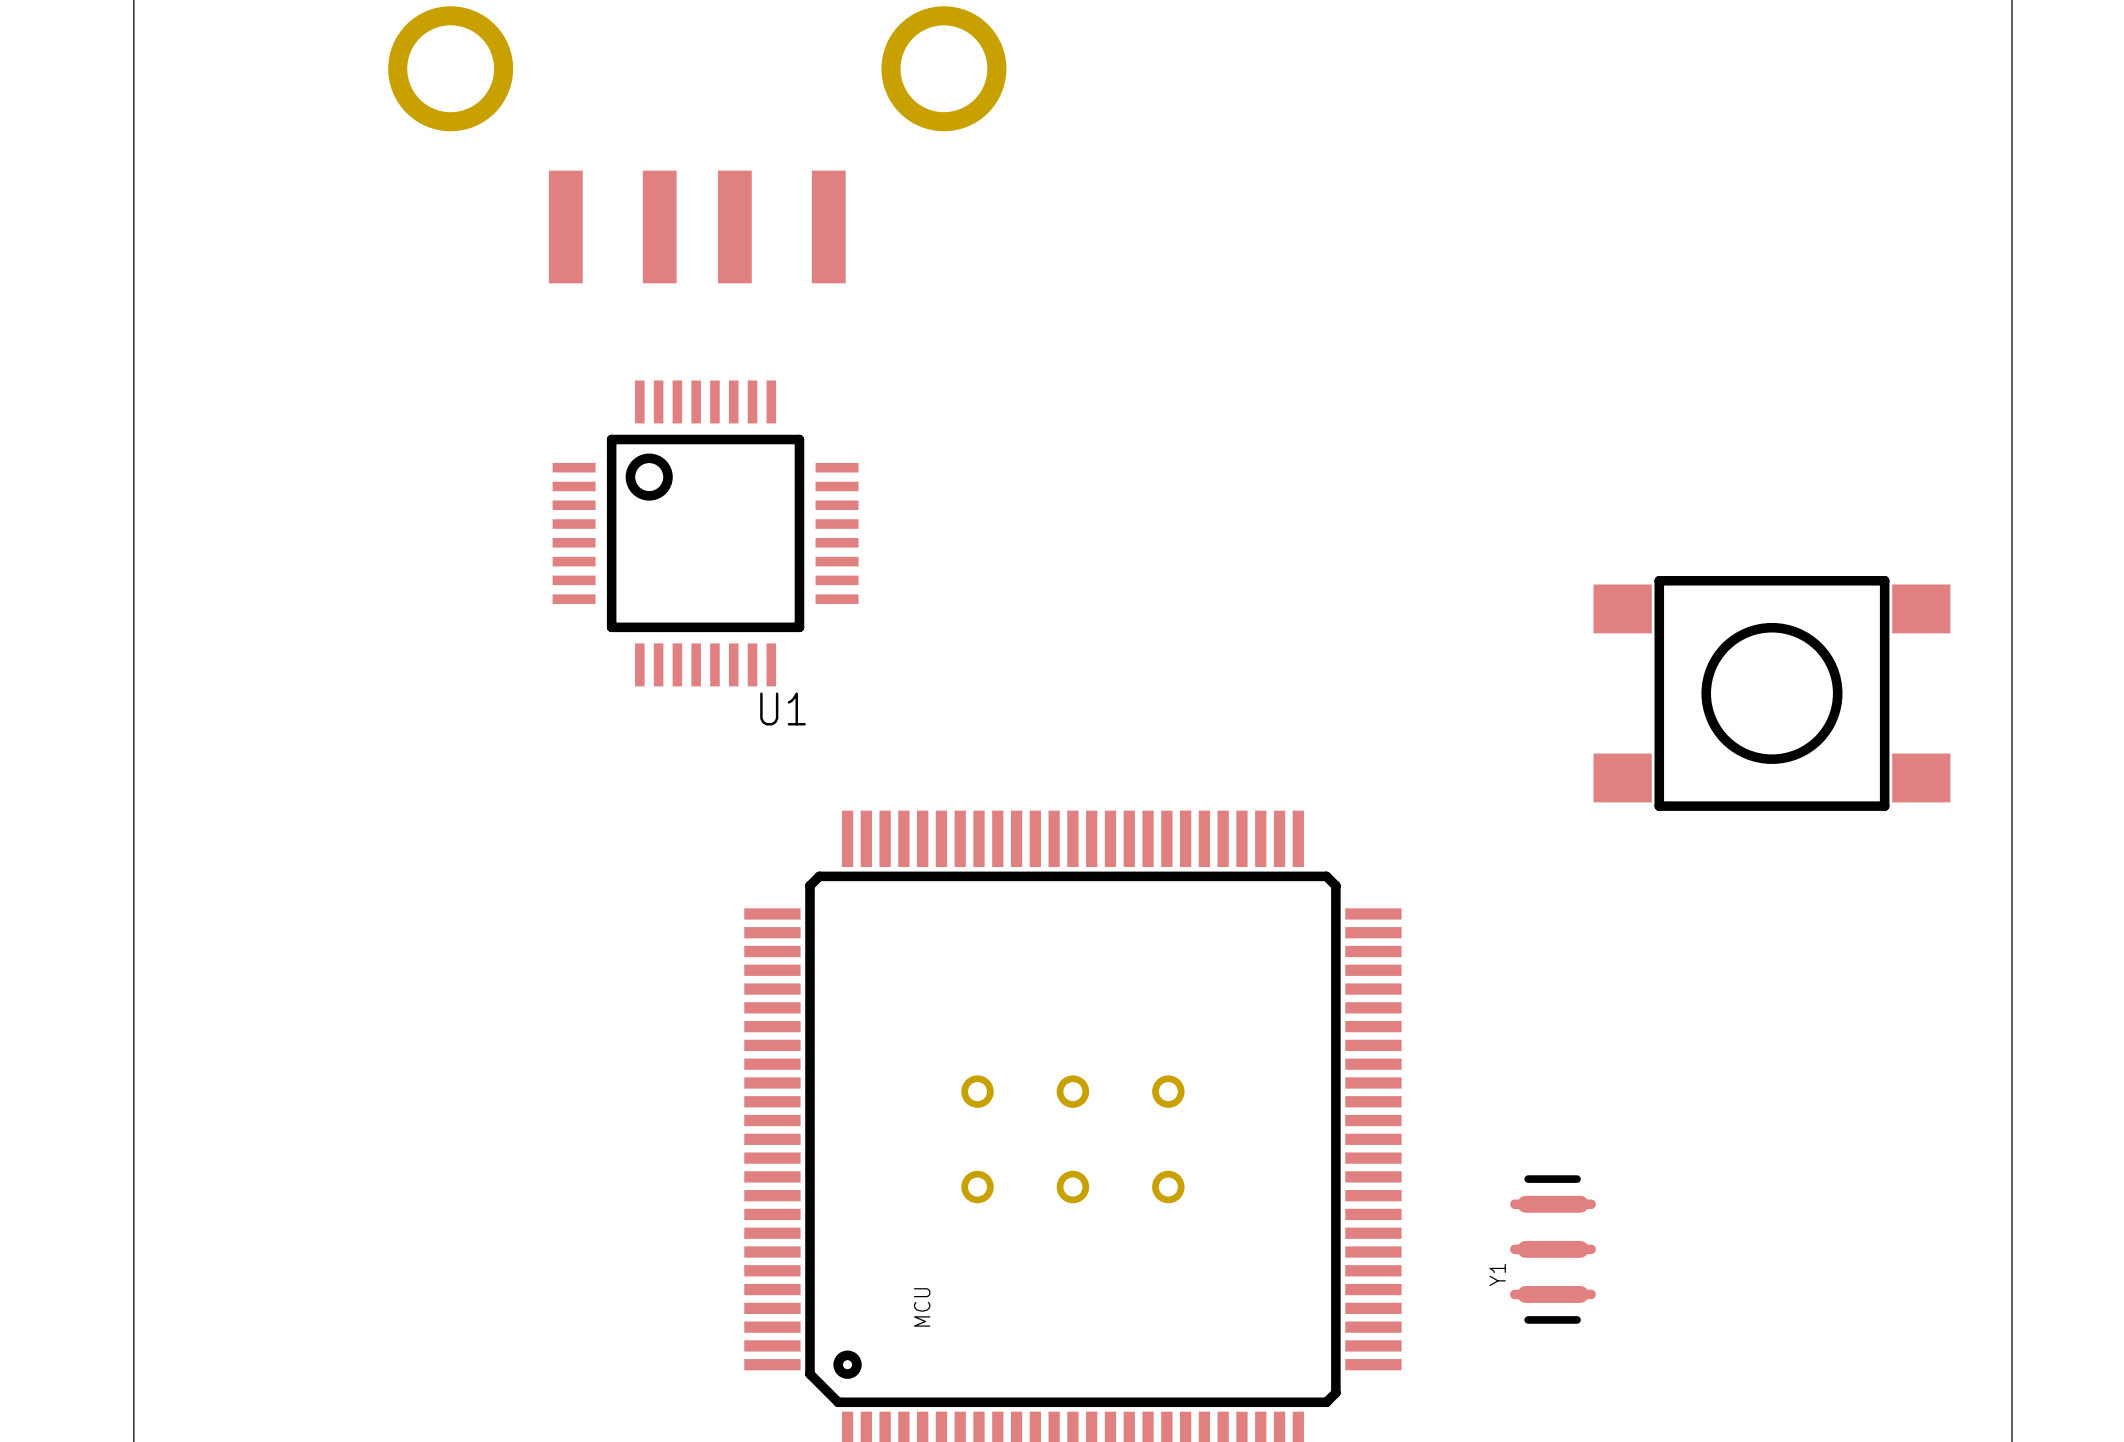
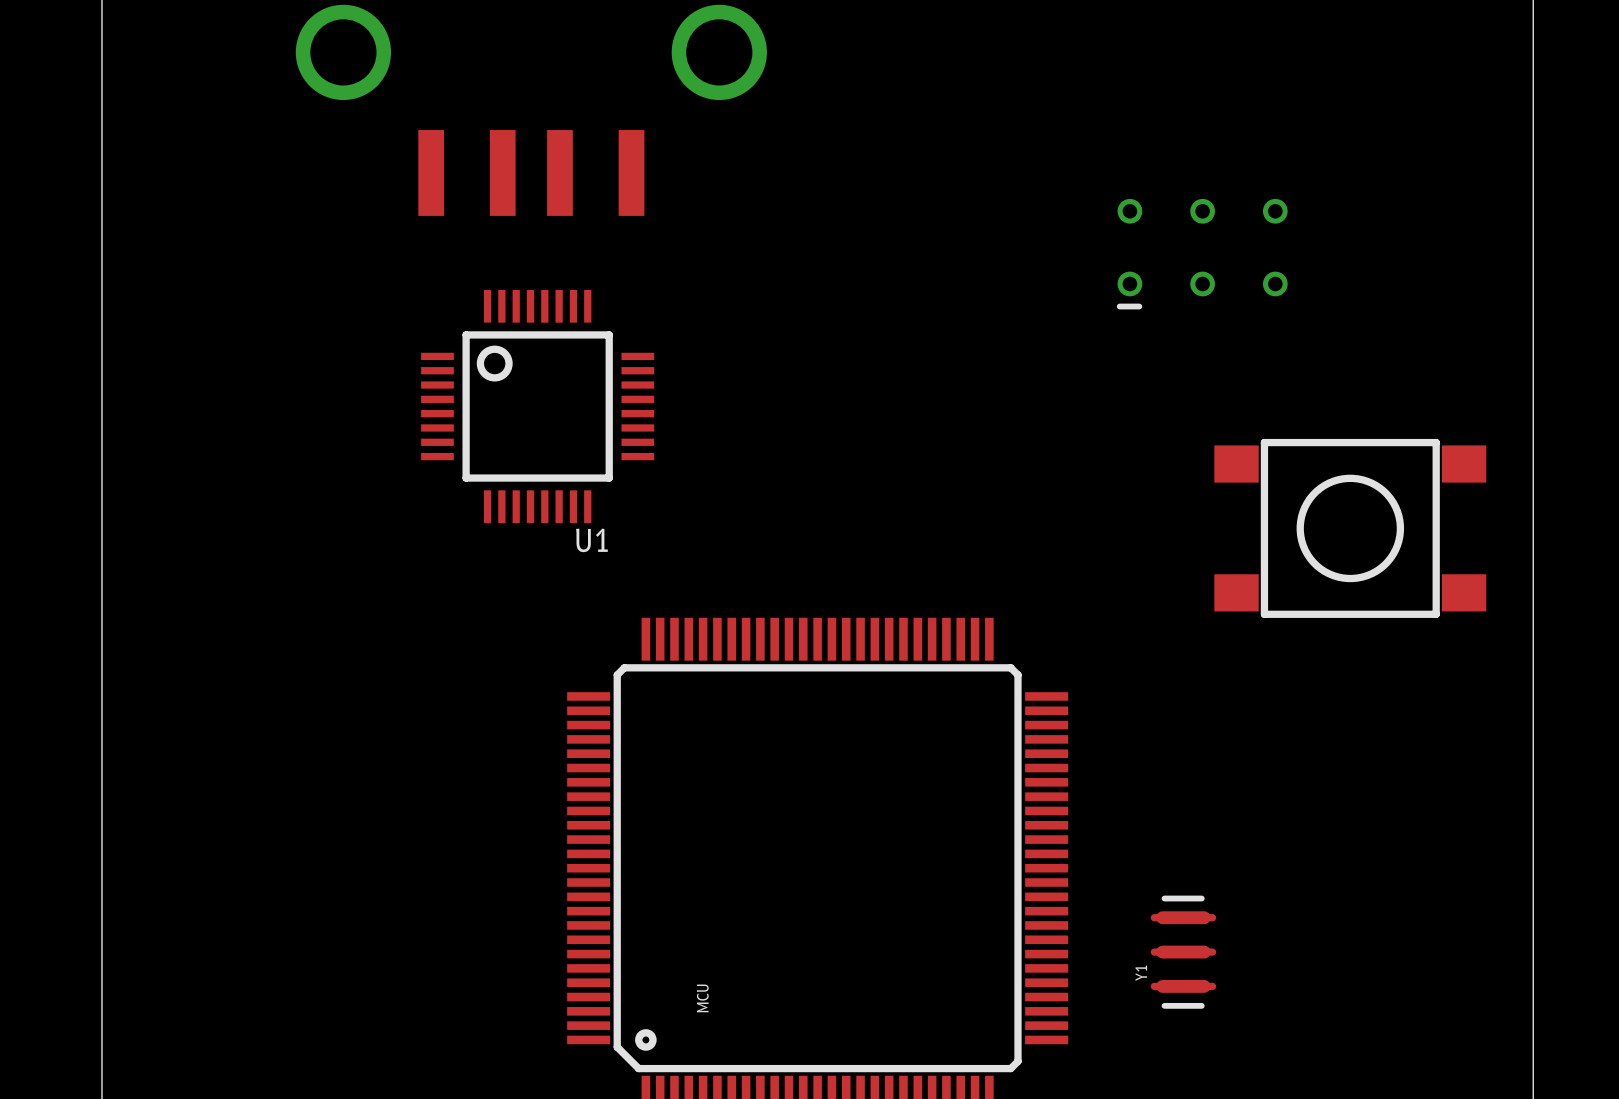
part: none -> (1202, 254)
part: (1072, 1139) -> none

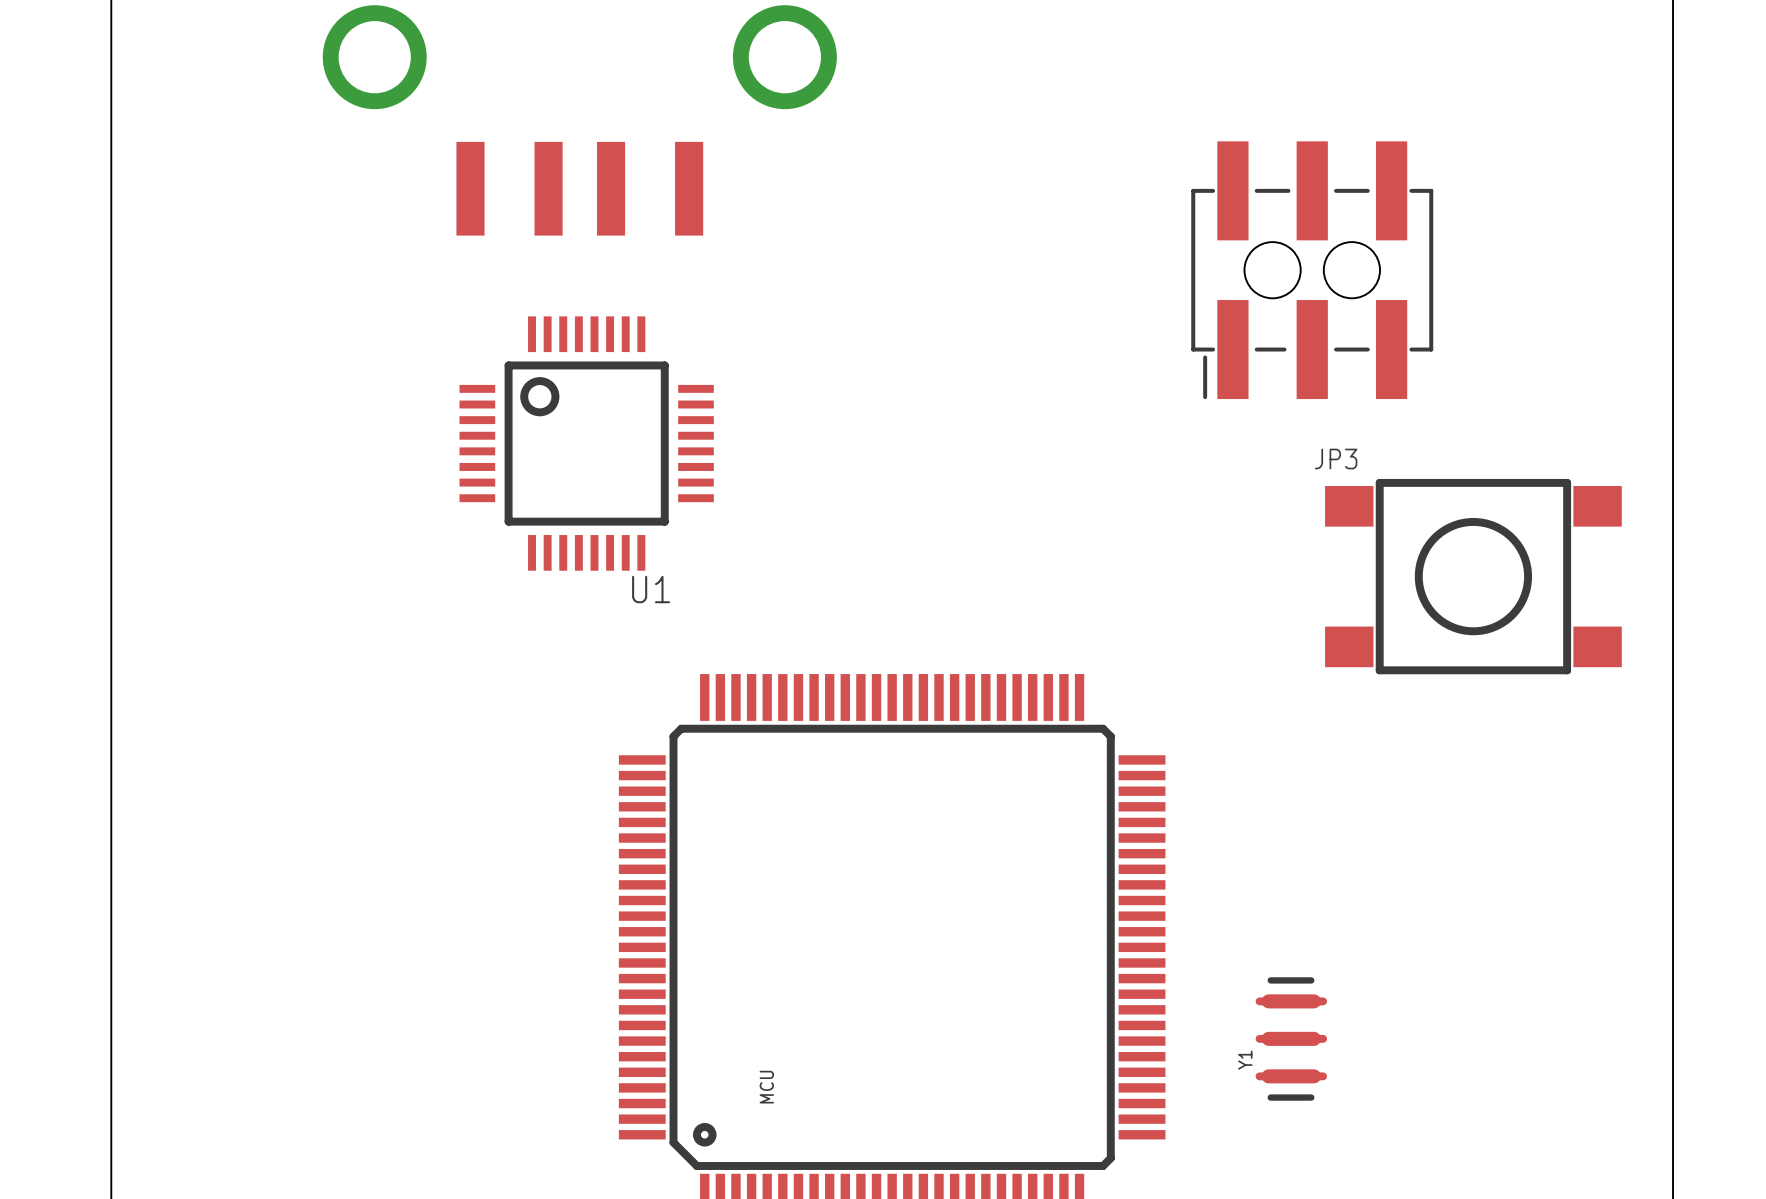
JP3: none -> (1312, 270)
part: (1202, 254) -> none

